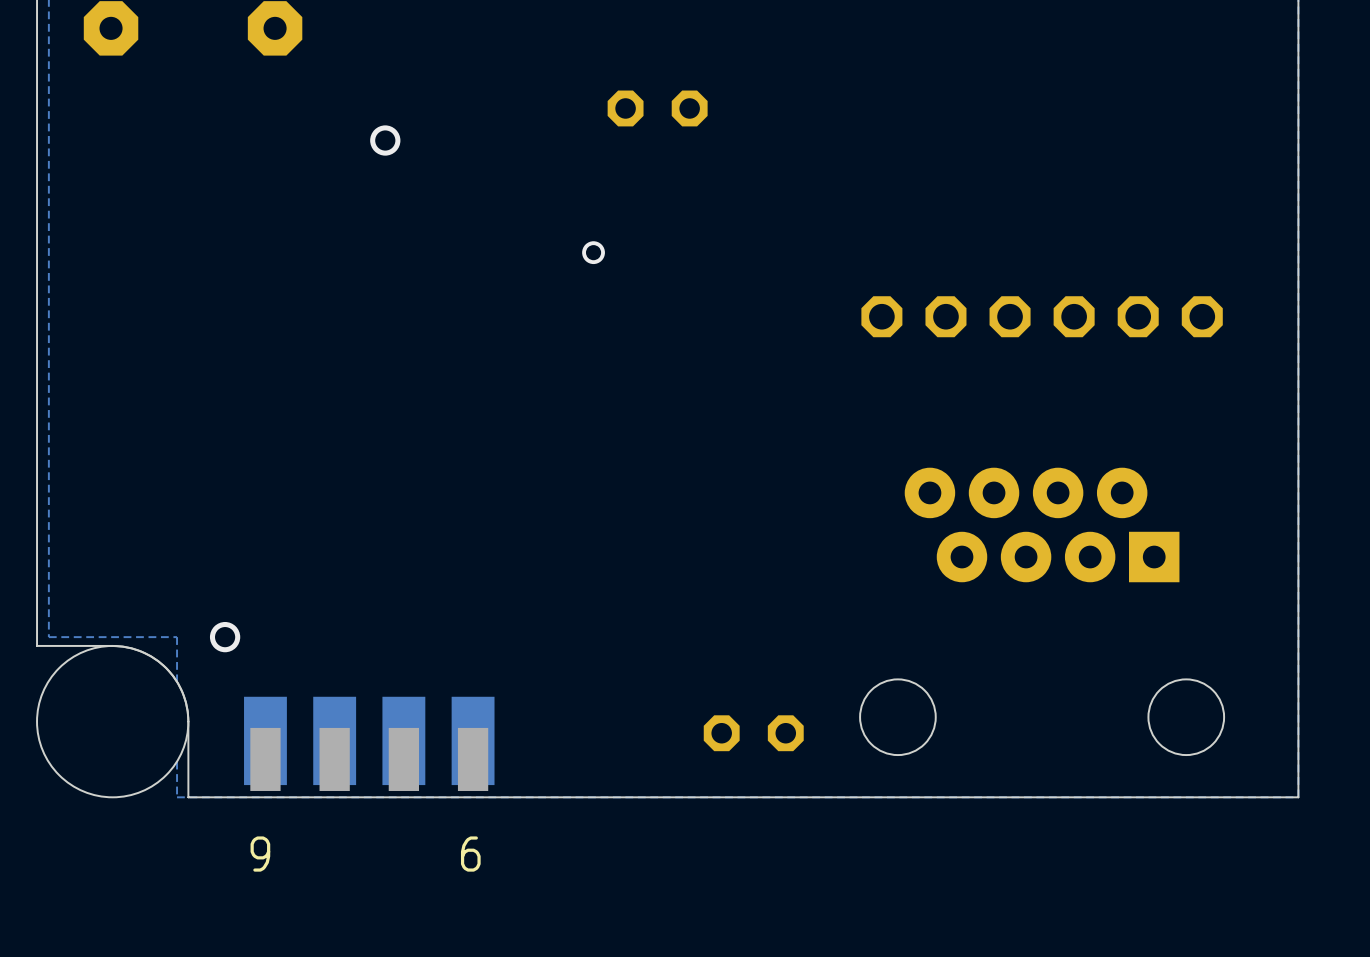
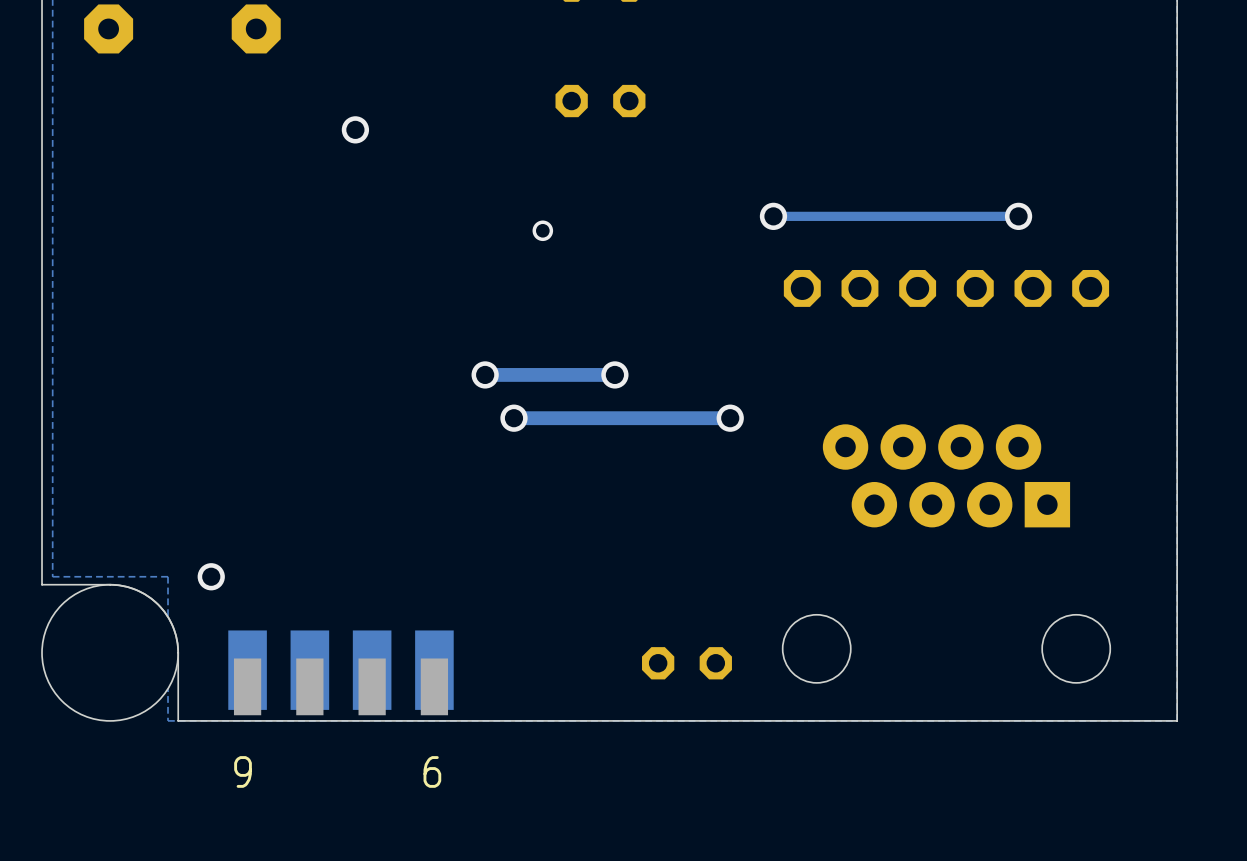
via: none -> (773, 216)
track: none -> (1018, 216) (773, 216)
via: none -> (1018, 216)
track: none -> (485, 371) (489, 374) (614, 374)
via: none -> (485, 374)
via: none -> (614, 374)
via: none -> (513, 418)
track: none -> (730, 418) (513, 418)
via: none -> (730, 418)

